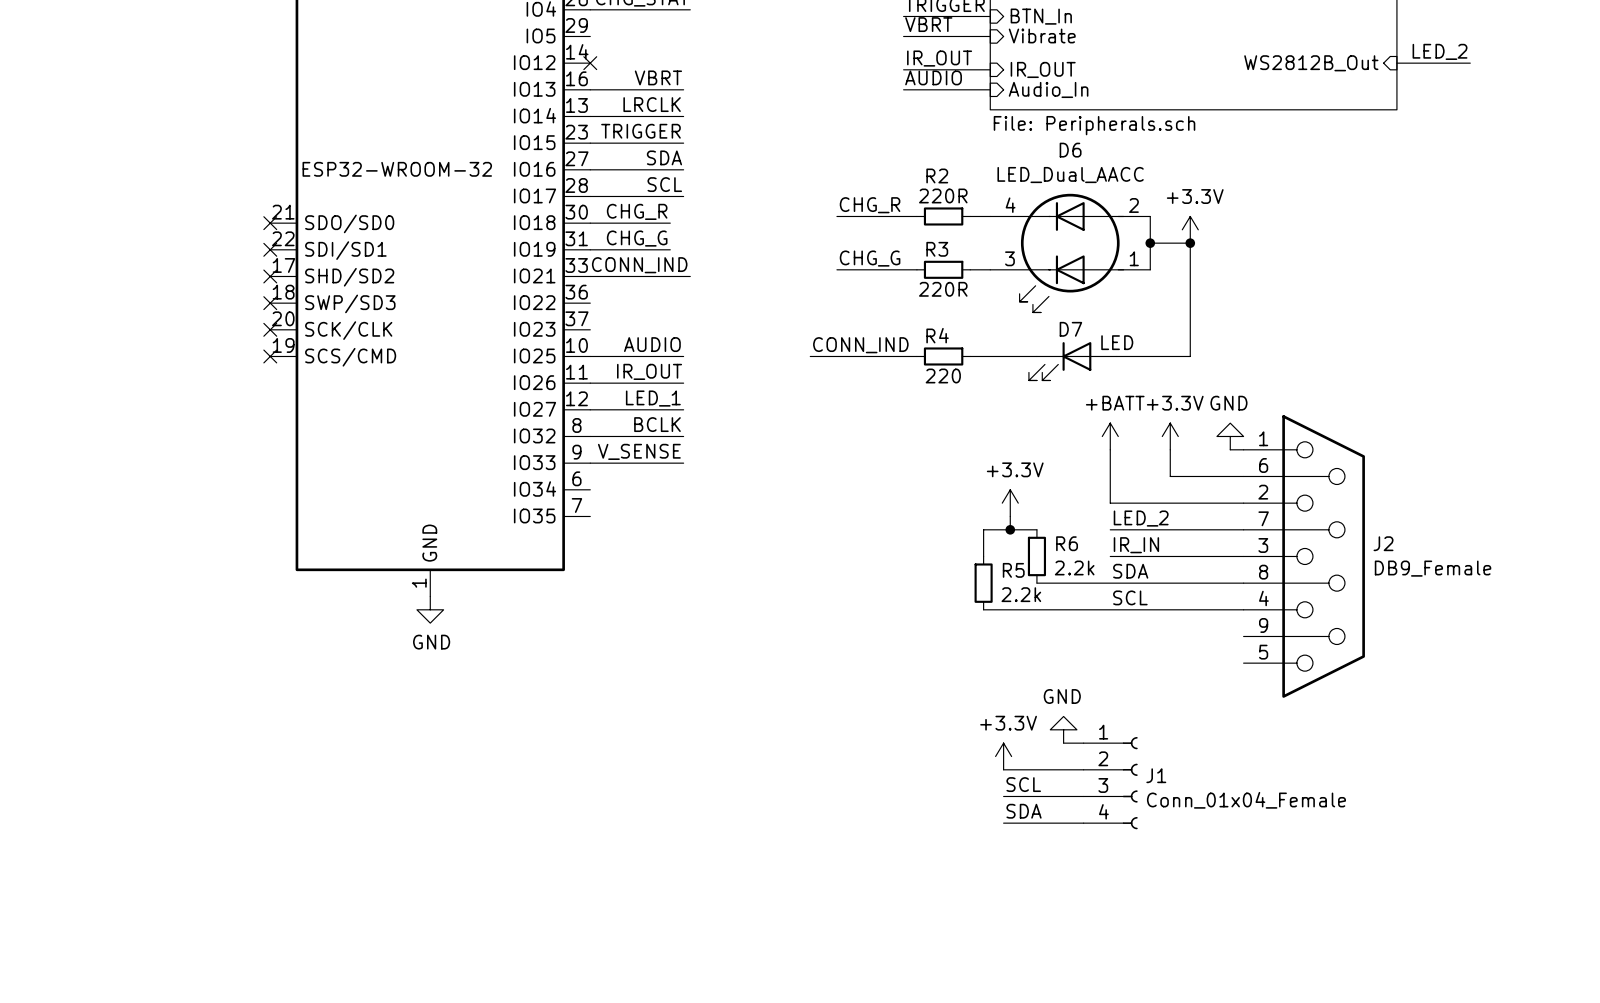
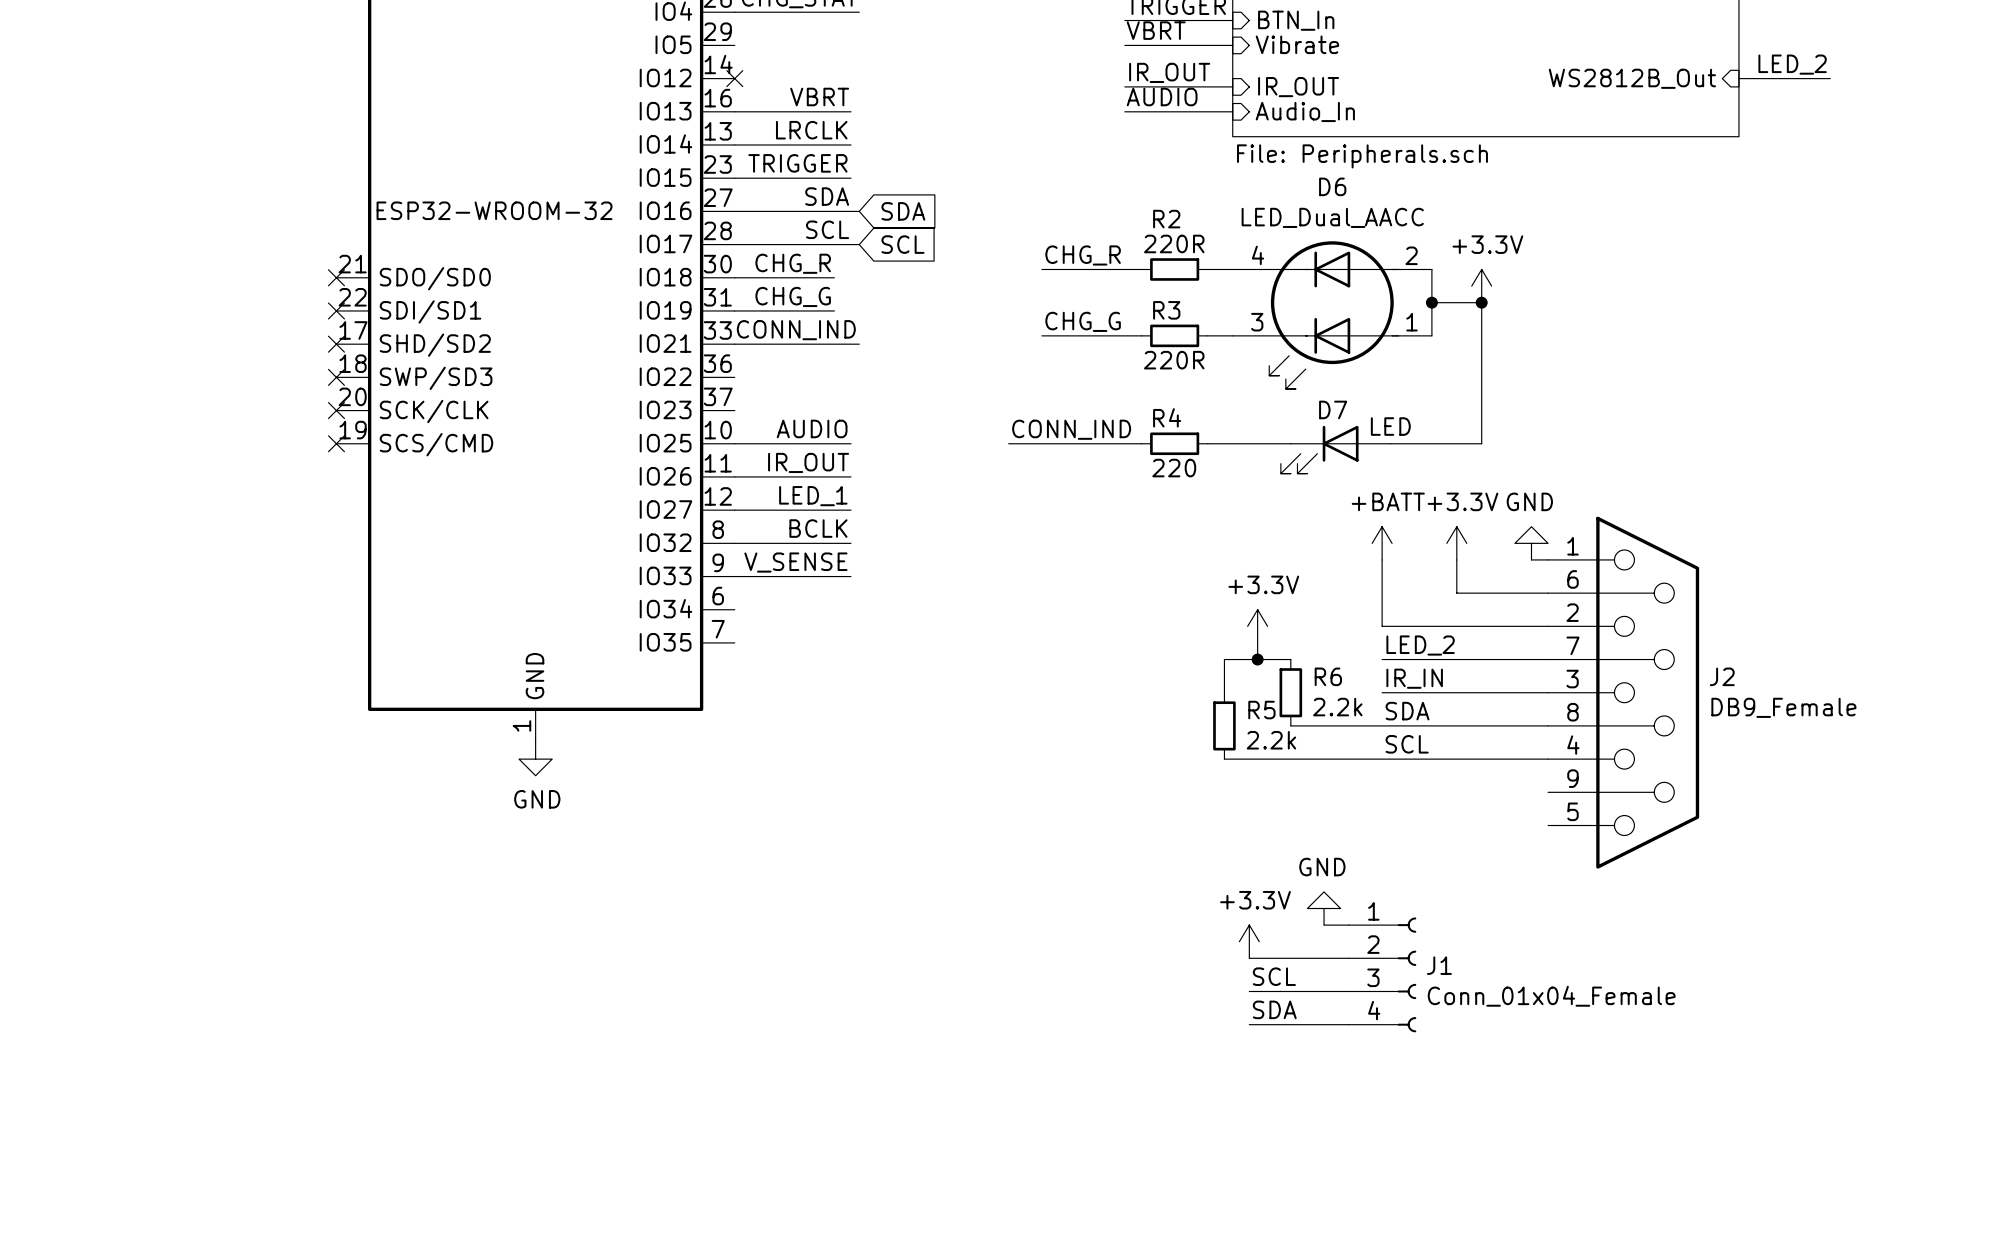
wire: none -> (850, 211) (859, 211)
global label: none -> SDA (903, 211)
wire: none -> (850, 244) (859, 244)
global label: none -> SCL (902, 244)

